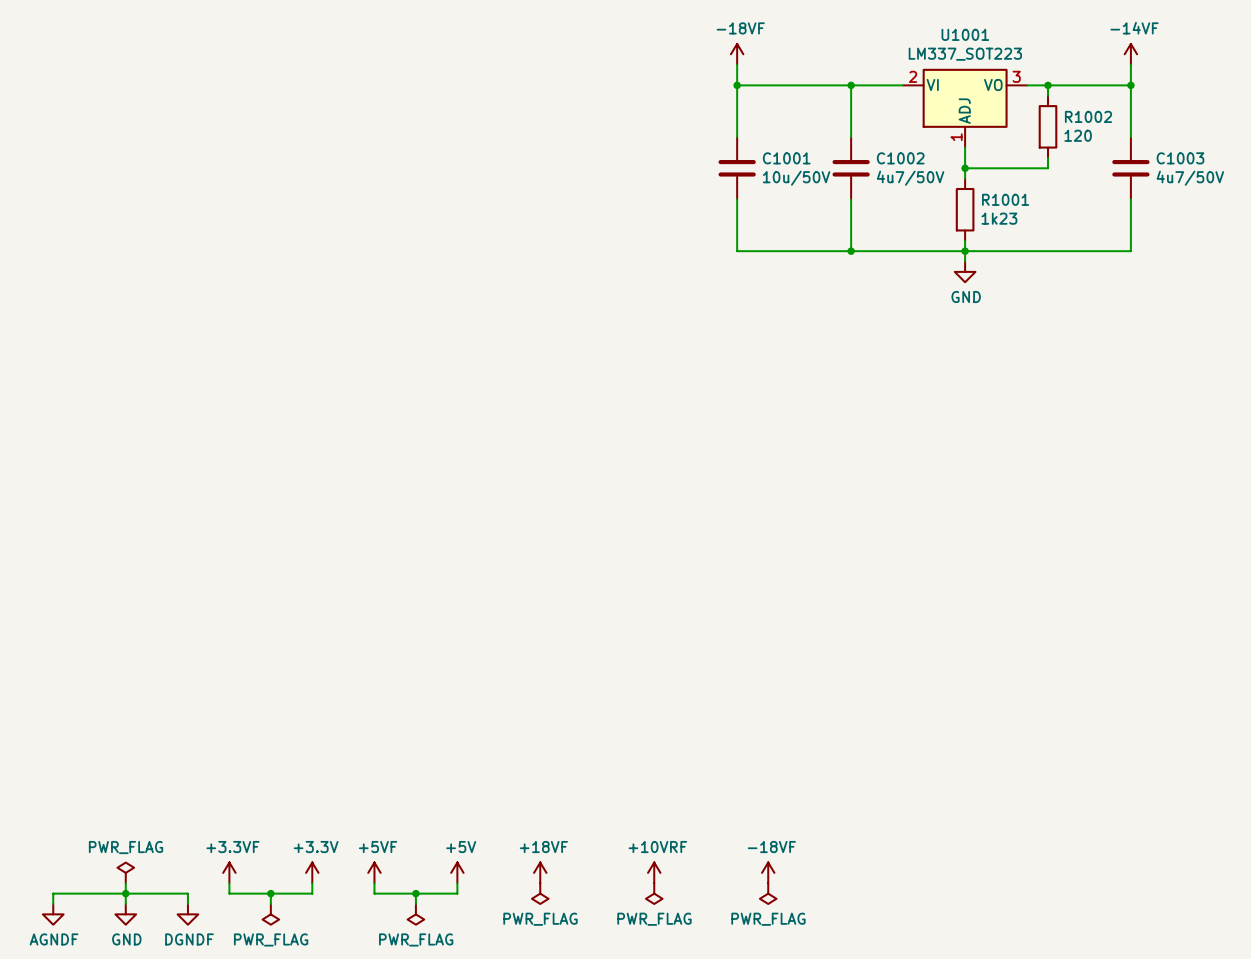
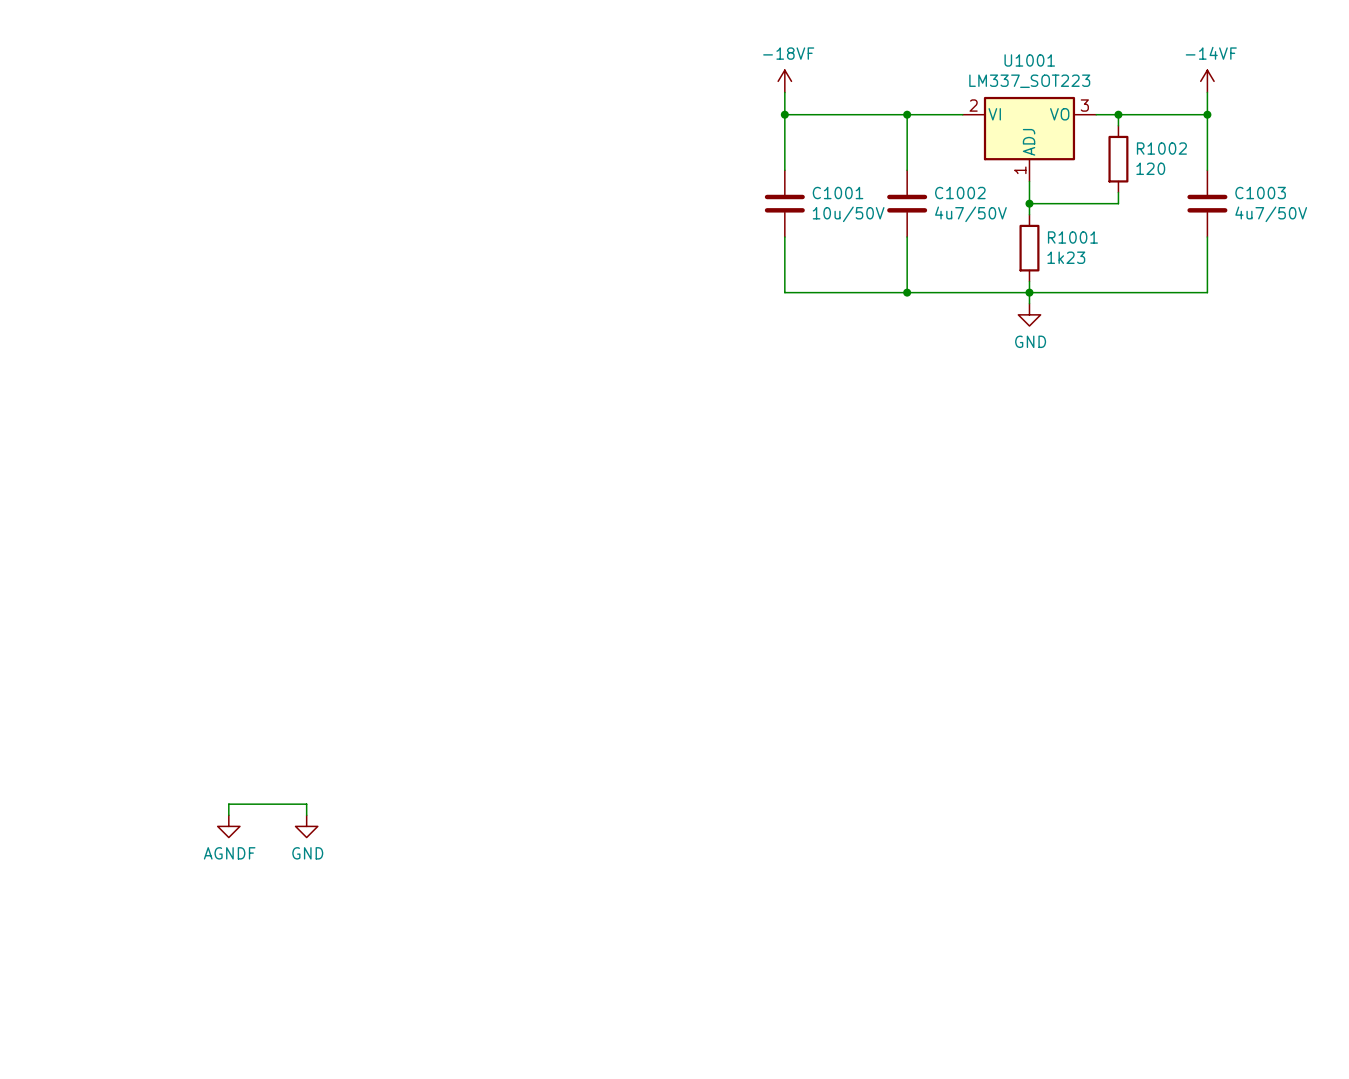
wire: none -> (228, 815) (228, 804) (306, 804) (306, 815)
power symbol: none -> AGNDF (228, 826)
power symbol: none -> GND (306, 826)
power symbol: PWR_FLAG (125, 872) -> none
power symbol: +3.3VF (229, 872) -> none
power symbol: +3.3V (312, 872) -> none
power symbol: +5VF (374, 872) -> none
power symbol: +5V (457, 872) -> none
power symbol: +18VF (540, 872) -> none
power symbol: +10VRF (654, 872) -> none
power symbol: -18VF (768, 872) -> none
wire: (125, 883) (125, 903) -> none
wire: (229, 883) (229, 893) (312, 893) (312, 883) -> none
wire: (374, 883) (374, 893) (457, 893) (457, 883) -> none
junction: (125, 893) -> none
wire: (270, 893) (270, 903) -> none
junction: (270, 893) -> none
wire: (415, 893) (415, 903) -> none
junction: (415, 893) -> none
power symbol: PWR_FLAG (540, 893) -> none
power symbol: PWR_FLAG (654, 893) -> none
power symbol: PWR_FLAG (768, 893) -> none
wire: (53, 903) (53, 893) (187, 893) (187, 903) -> none
power symbol: AGNDF (53, 914) -> none
power symbol: GND (125, 914) -> none
power symbol: DGNDF (187, 914) -> none
power symbol: PWR_FLAG (270, 914) -> none
power symbol: PWR_FLAG (415, 914) -> none

